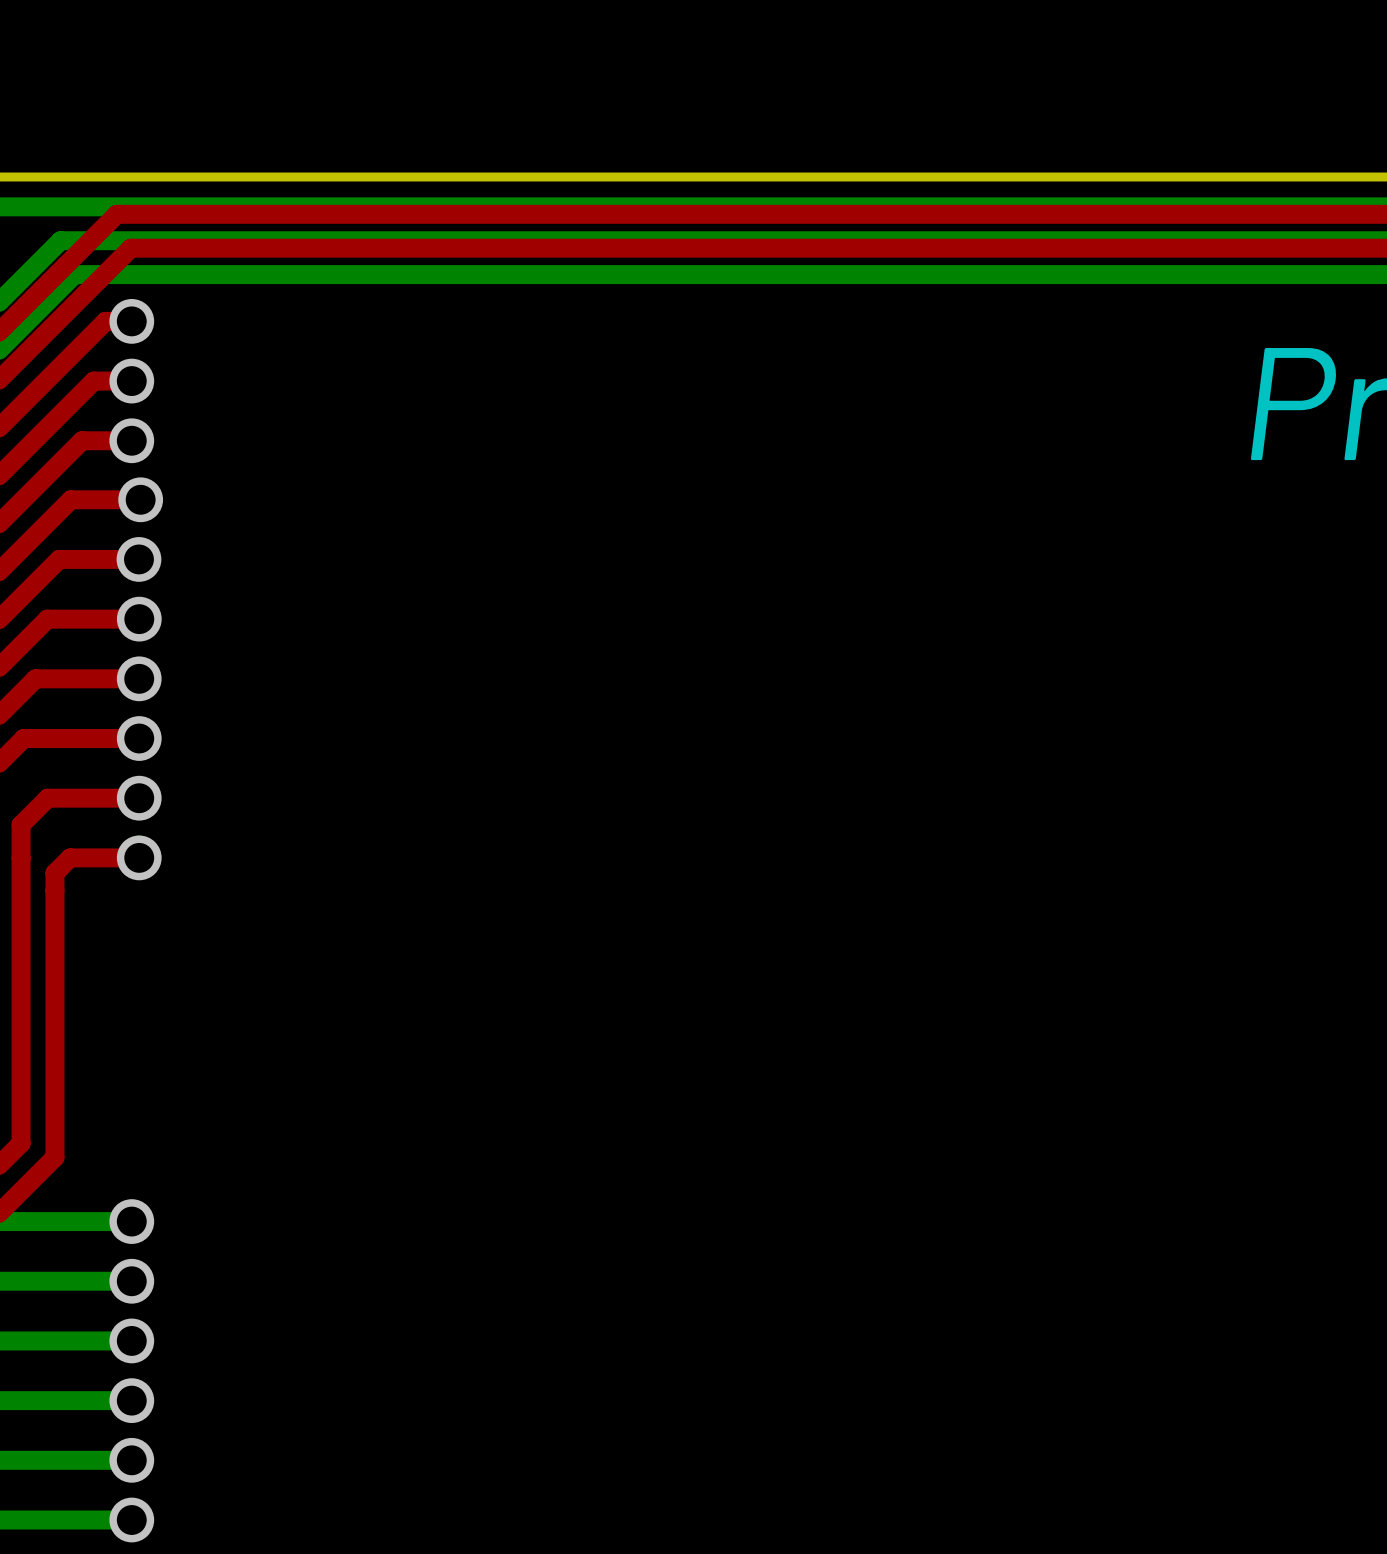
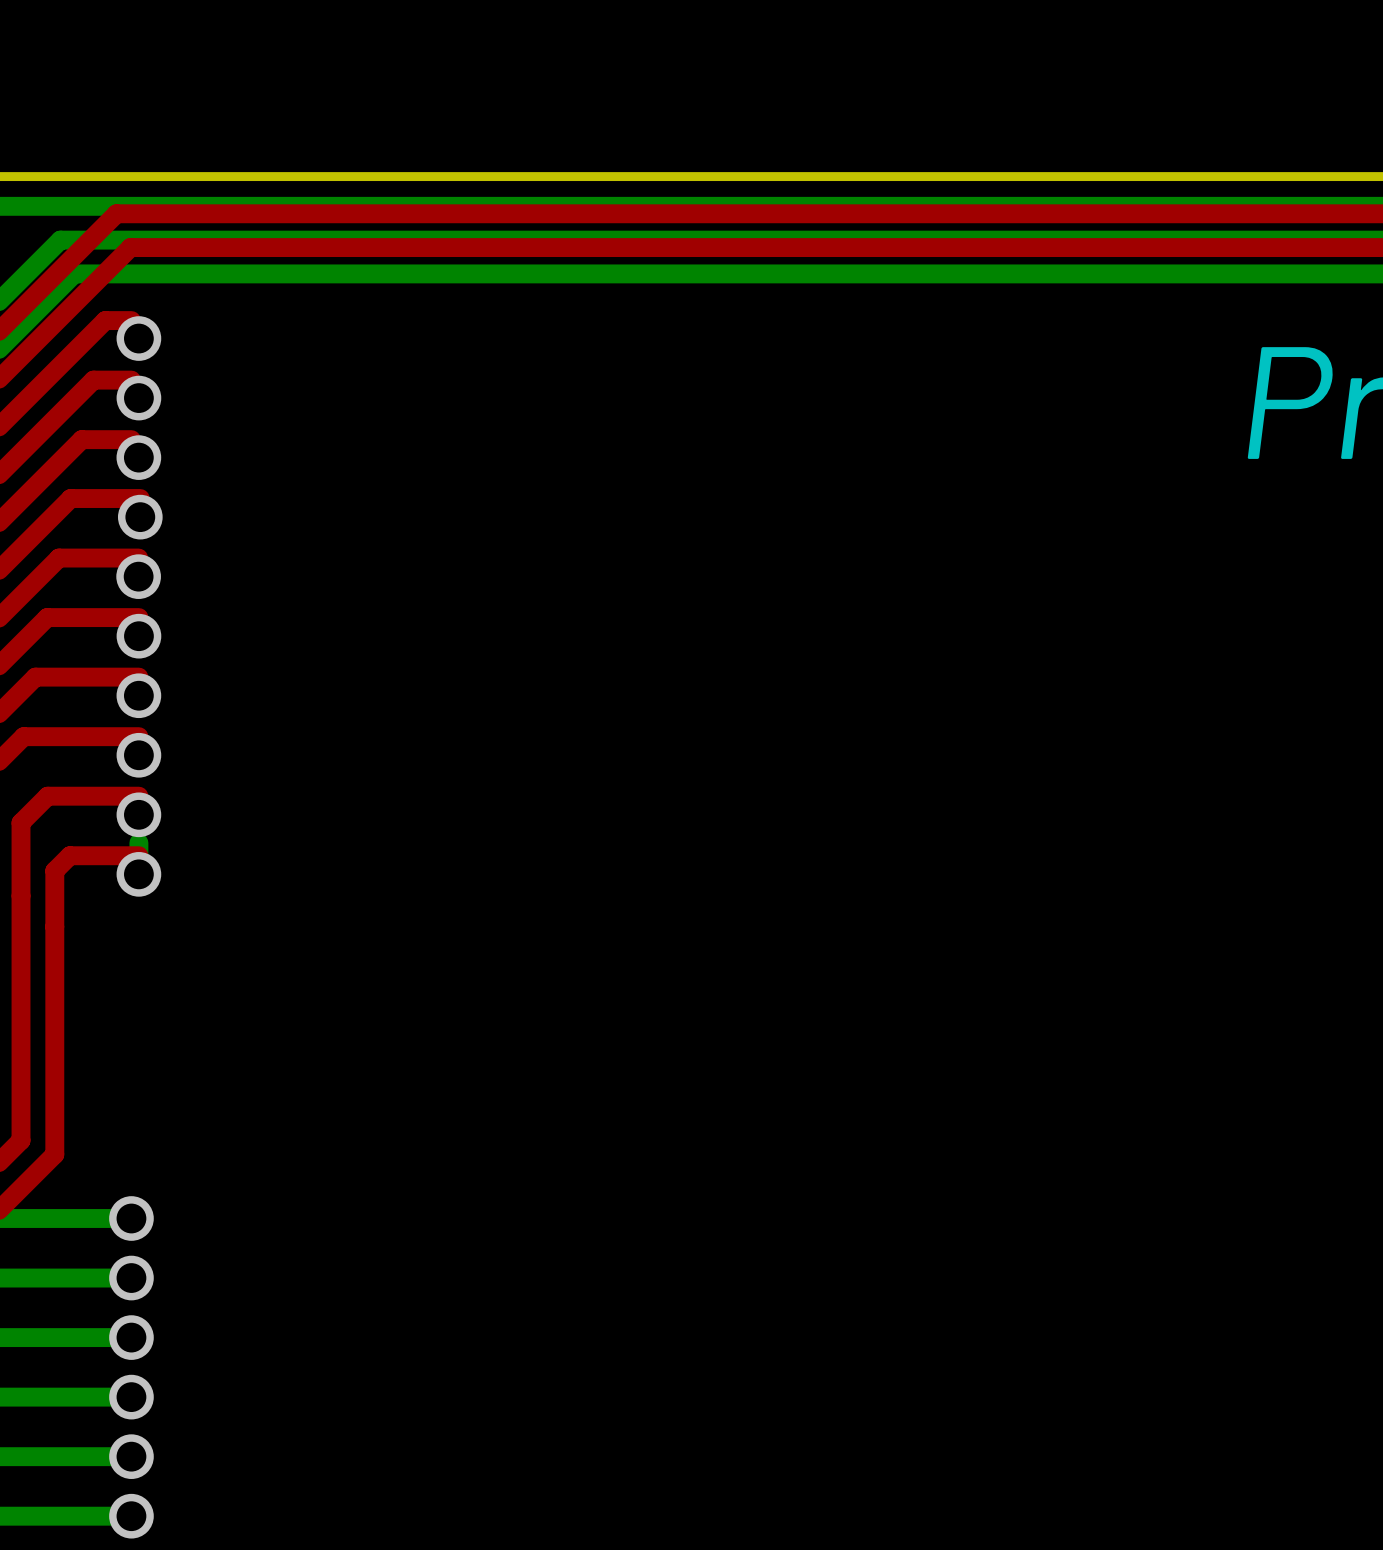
via position: (131, 321) -> (138, 338)
via position: (131, 381) -> (138, 398)
via position: (131, 440) -> (138, 457)
via position: (140, 499) -> (140, 517)
via position: (138, 559) -> (138, 576)
via position: (139, 619) -> (138, 636)
via position: (139, 678) -> (138, 695)
via position: (139, 738) -> (138, 755)
via position: (139, 798) -> (138, 814)
via position: (139, 857) -> (138, 874)

